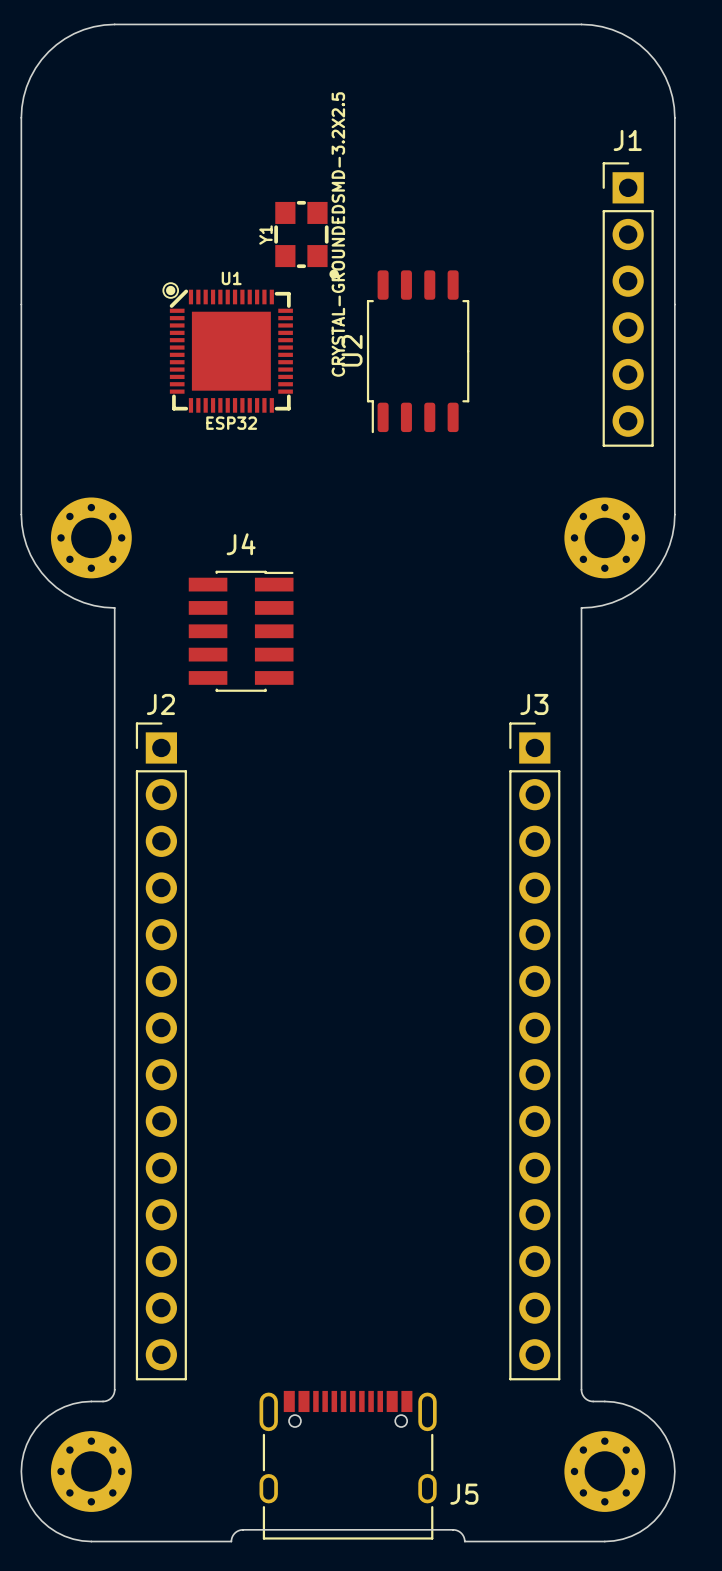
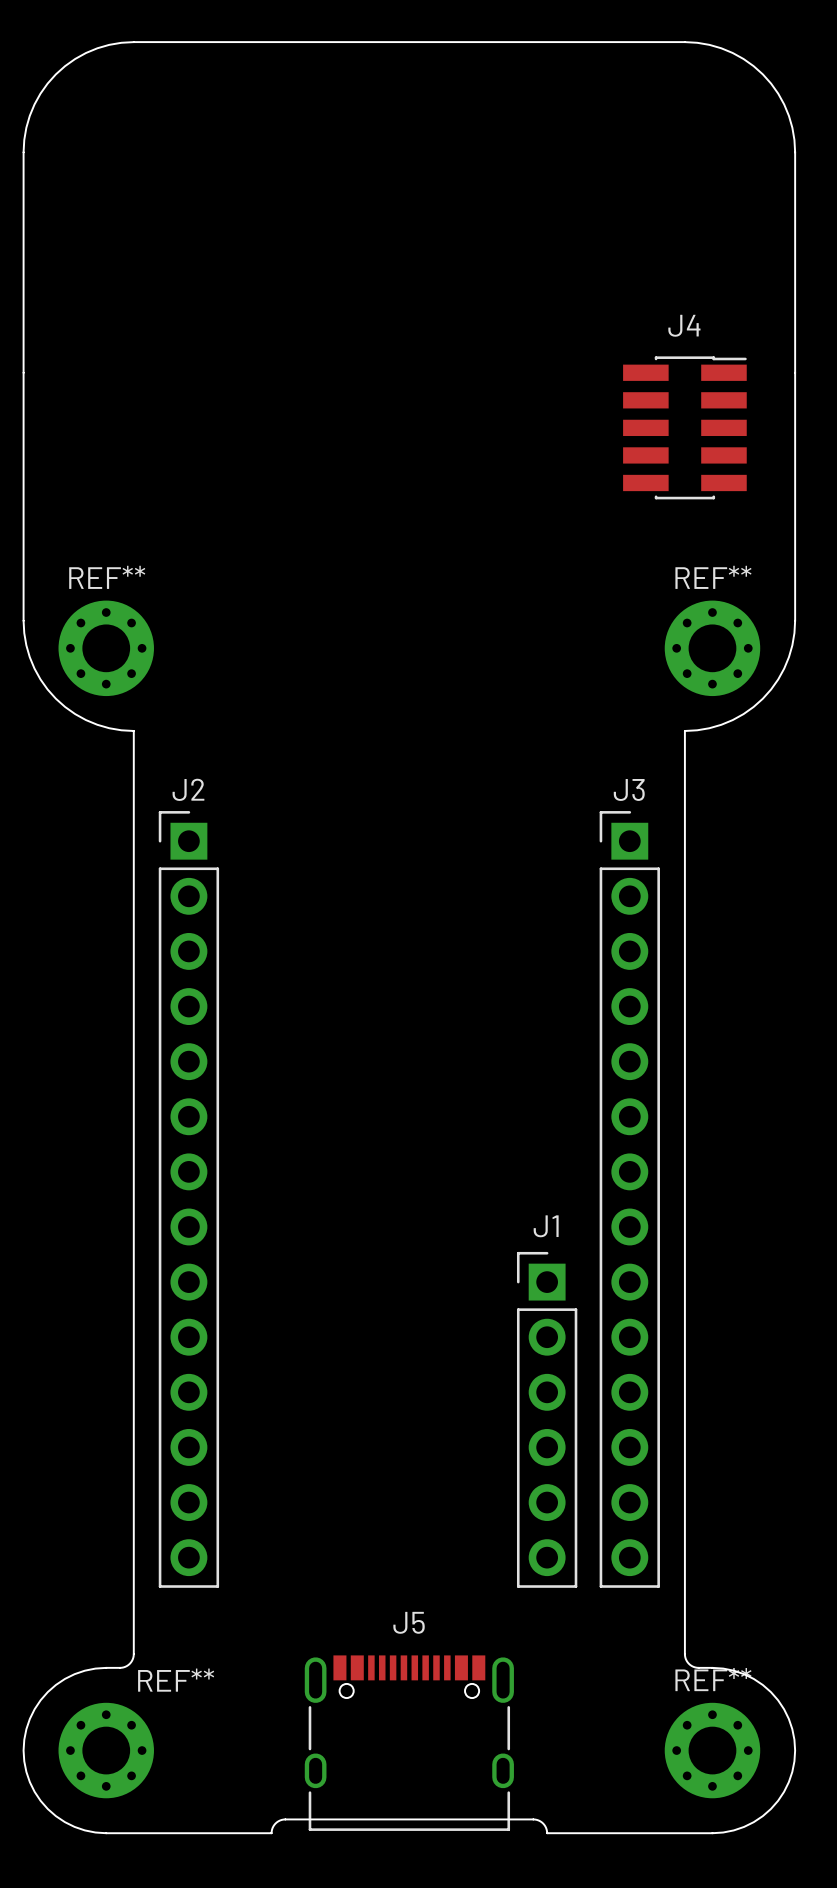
Y1: CRYSTAL-GROUNDEDSMD-3.2X2.5 (306, 239) -> none
J1 position: (628, 304) -> (547, 1419)
U1: ESP32 (227, 347) -> none
U2: (418, 351) -> none
REF** name: none -> REF** (107, 577)
REF** name: none -> REF** (713, 577)
J4 position: (241, 631) -> (684, 427)
J2 position: (161, 1051) -> (188, 1199)
J3 position: (534, 1051) -> (629, 1199)
REF** name: none -> REF** (176, 1680)
REF** name: none -> REF** (713, 1679)
J5 name position: J5 (464, 1494) -> J5 (409, 1622)

